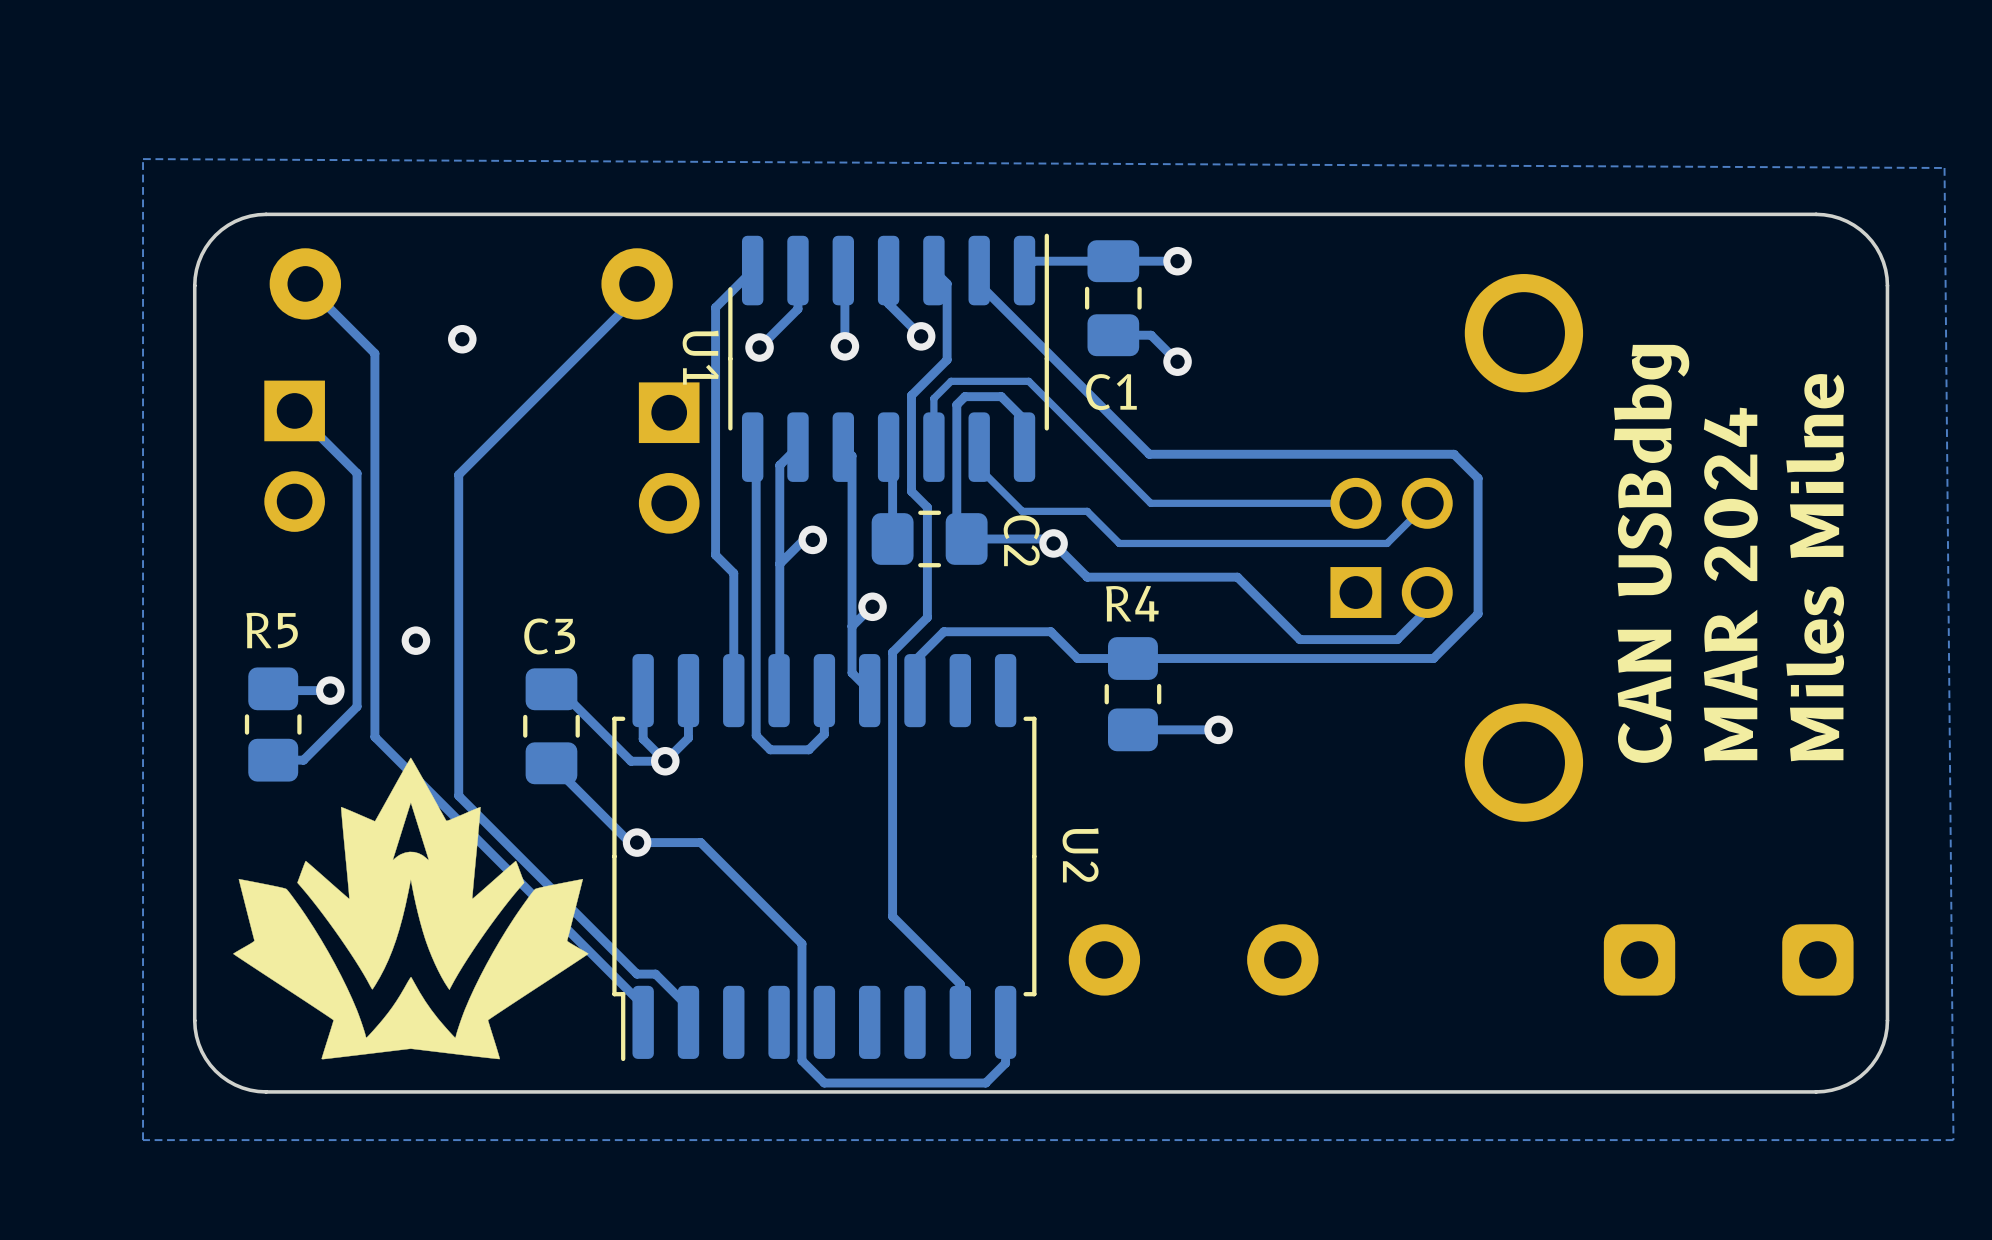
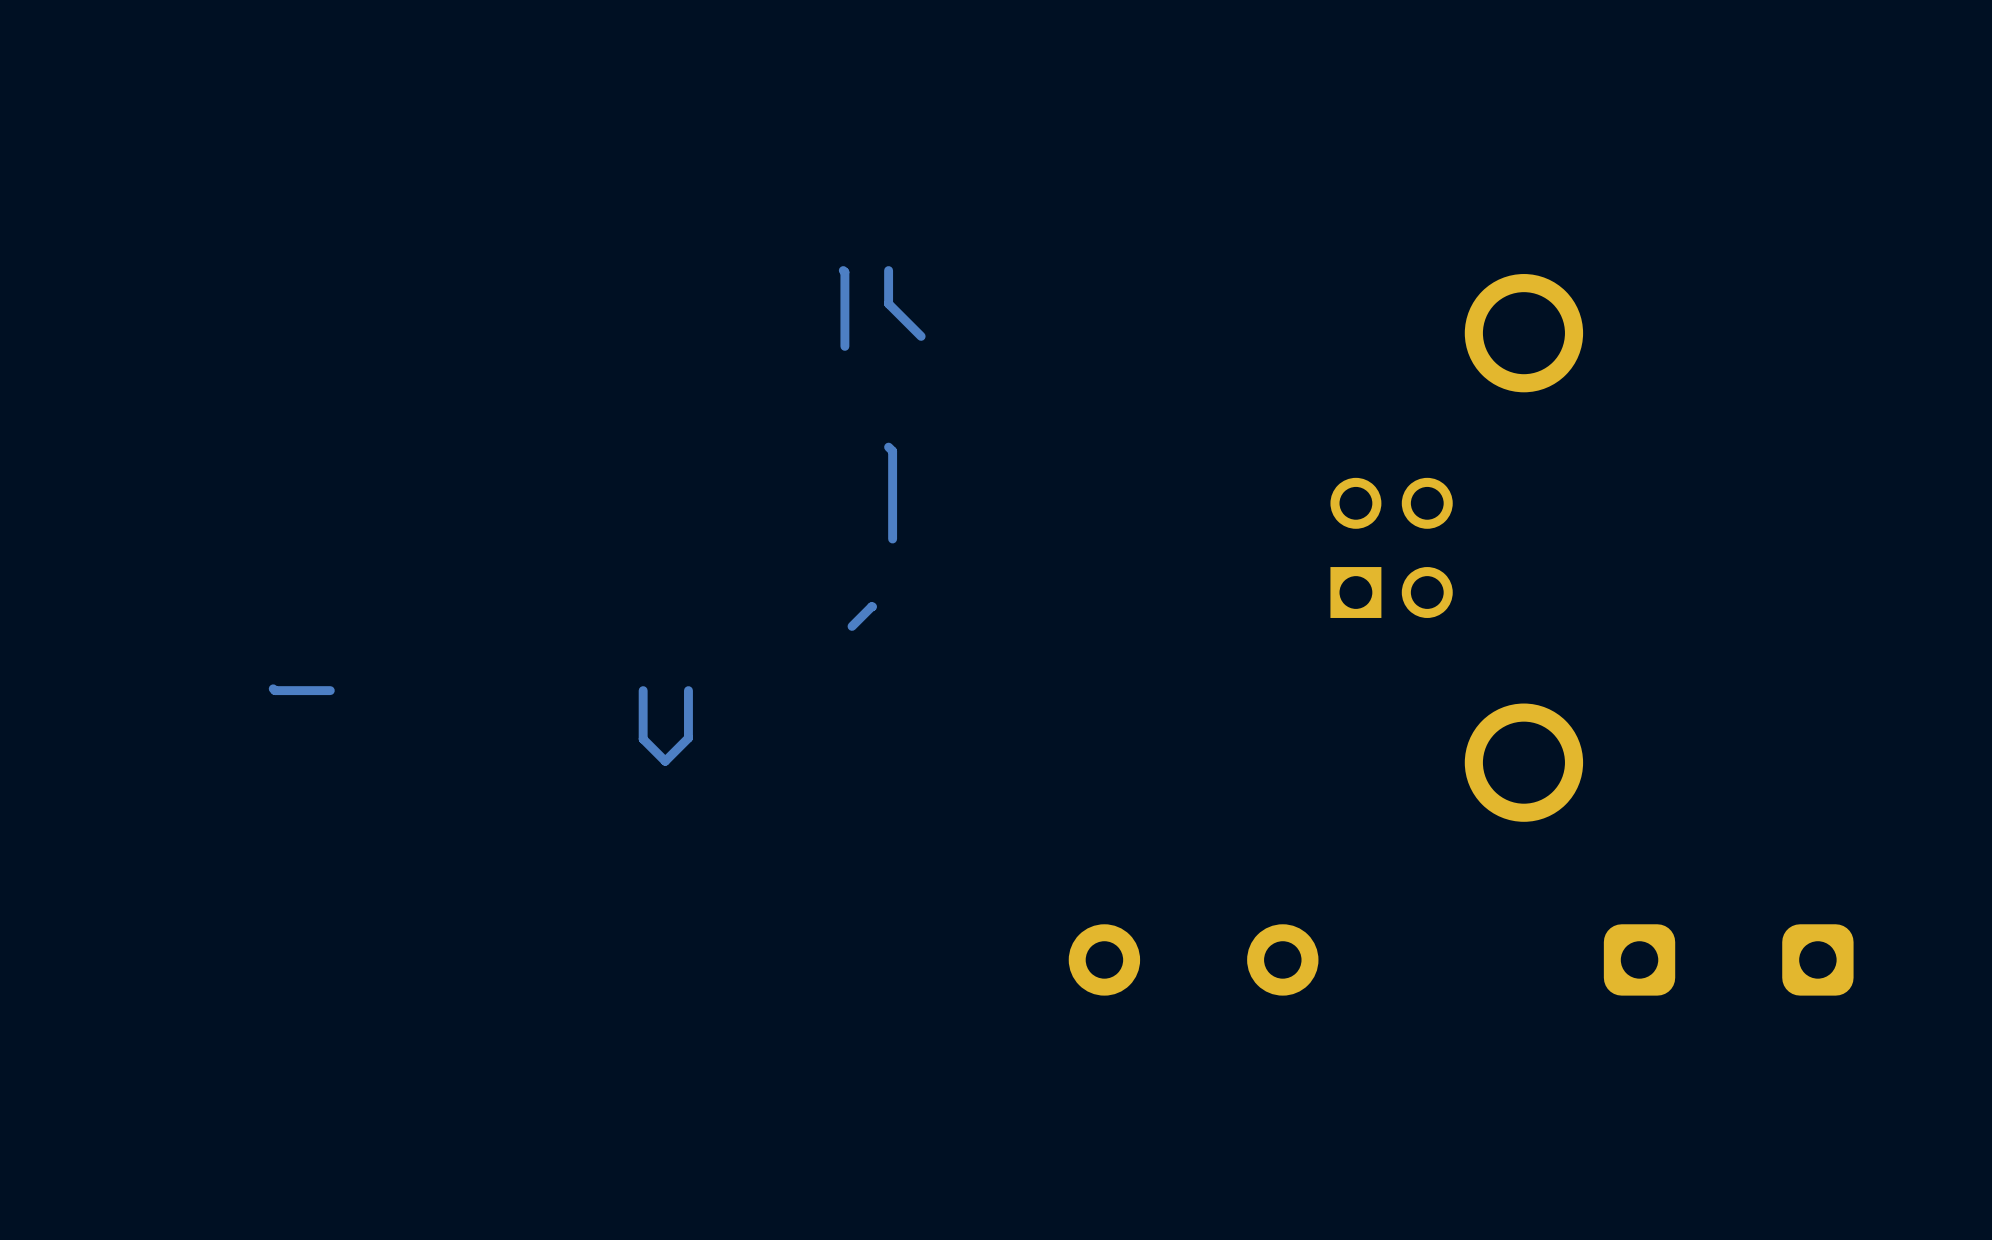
zone outline: (143, 159) (143, 1140) (1953, 1140) (1944, 167) (143, 159) -> none
board edge: (1816, 214) (266, 214) (250, 216) (235, 221) (221, 229) (205, 247) (198, 262) (194, 285) (194, 1020) (196, 1036) (201, 1051) (215, 1071) (228, 1081) (250, 1090) (266, 1091) (1816, 1091) (1831, 1090) (1847, 1084) (1866, 1071) (1876, 1058) (1885, 1036) (1887, 1020) (1887, 285) (1885, 269) (1880, 254) (1866, 235) (1854, 225) (1839, 218) (1816, 214) -> none
track: (1177, 261) (1033, 261) (1024, 270) -> none
via: (1177, 261) -> none
track: (752, 270) (715, 307) (715, 555) (733, 573) (733, 690) -> none
track: (797, 270) (797, 309) (759, 347) -> none
track: (933, 270) (947, 283) (947, 359) (911, 395) (911, 491) (927, 507) (927, 617) (892, 652) (892, 916) (960, 984) (960, 1022) -> none
track: (979, 270) (979, 284) (1149, 454) (1454, 454) (1478, 478) (1478, 613) (1433, 658) (1077, 658) (1050, 631) (943, 631) (914, 660) (914, 690) -> none
track: (653, 280) (458, 474) (458, 795) (636, 974) (655, 974) (688, 1006) (688, 1022) -> none
track: (305, 283) (374, 353) (374, 736) (643, 1005) (643, 1022) -> none
part: (305, 283) -> none
part: (637, 283) -> none
C1: (1113, 298) -> none
track: (1113, 335) (1151, 335) (1177, 361) -> none
via: (921, 336) -> none
via: (462, 339) -> none
via: (844, 346) -> none
via: (759, 347) -> none
U1: (888, 357) -> none
via: (1177, 361) -> none
track: (294, 410) (357, 473) (357, 706) (303, 760) (273, 760) -> none
track: (752, 447) (756, 450) (756, 735) (770, 749) (808, 749) (824, 734) (824, 690) -> none
track: (797, 447) (779, 465) (779, 690) -> none
track: (843, 447) (852, 455) (852, 672) (869, 690) -> none
track: (933, 447) (933, 398) (951, 381) (1028, 381) (1150, 503) (1355, 503) -> none
track: (979, 447) (979, 468) (1022, 511) (1087, 511) (1119, 543) (1387, 543) (1427, 503) -> none
track: (1024, 447) (1024, 419) (1001, 396) (964, 396) (956, 404) (956, 529) (966, 539) (1049, 539) (1087, 577) (1237, 577) (1299, 639) (1397, 639) (1427, 609) (1427, 592) -> none
part: (294, 456) -> none
part: (669, 458) -> none
track: (812, 539) (803, 539) (779, 563) -> none
via: (812, 539) -> none
C2: (929, 539) -> none
via: (1053, 543) -> none
text: CAN USBdbg (1651, 553) -> none
text: Miles Milne (1815, 567) -> none
text: MAR 2024 (1730, 584) -> none
via: (872, 606) -> none
via: (415, 640) -> none
track: (551, 689) (559, 689) (631, 761) (665, 761) -> none
via: (330, 690) -> none
R4: (1132, 694) -> none
R5: (273, 724) -> none
C3: (551, 726) -> none
track: (1218, 729) (1132, 729) -> none
via: (1218, 729) -> none
drawing: [233, 757, 589, 1060] -> none
via: (665, 761) -> none
track: (551, 763) (629, 842) (700, 842) (801, 943) (801, 1060) (824, 1083) (985, 1083) (1005, 1063) (1005, 1022) -> none
via: (637, 842) -> none
U2: (824, 857) -> none

